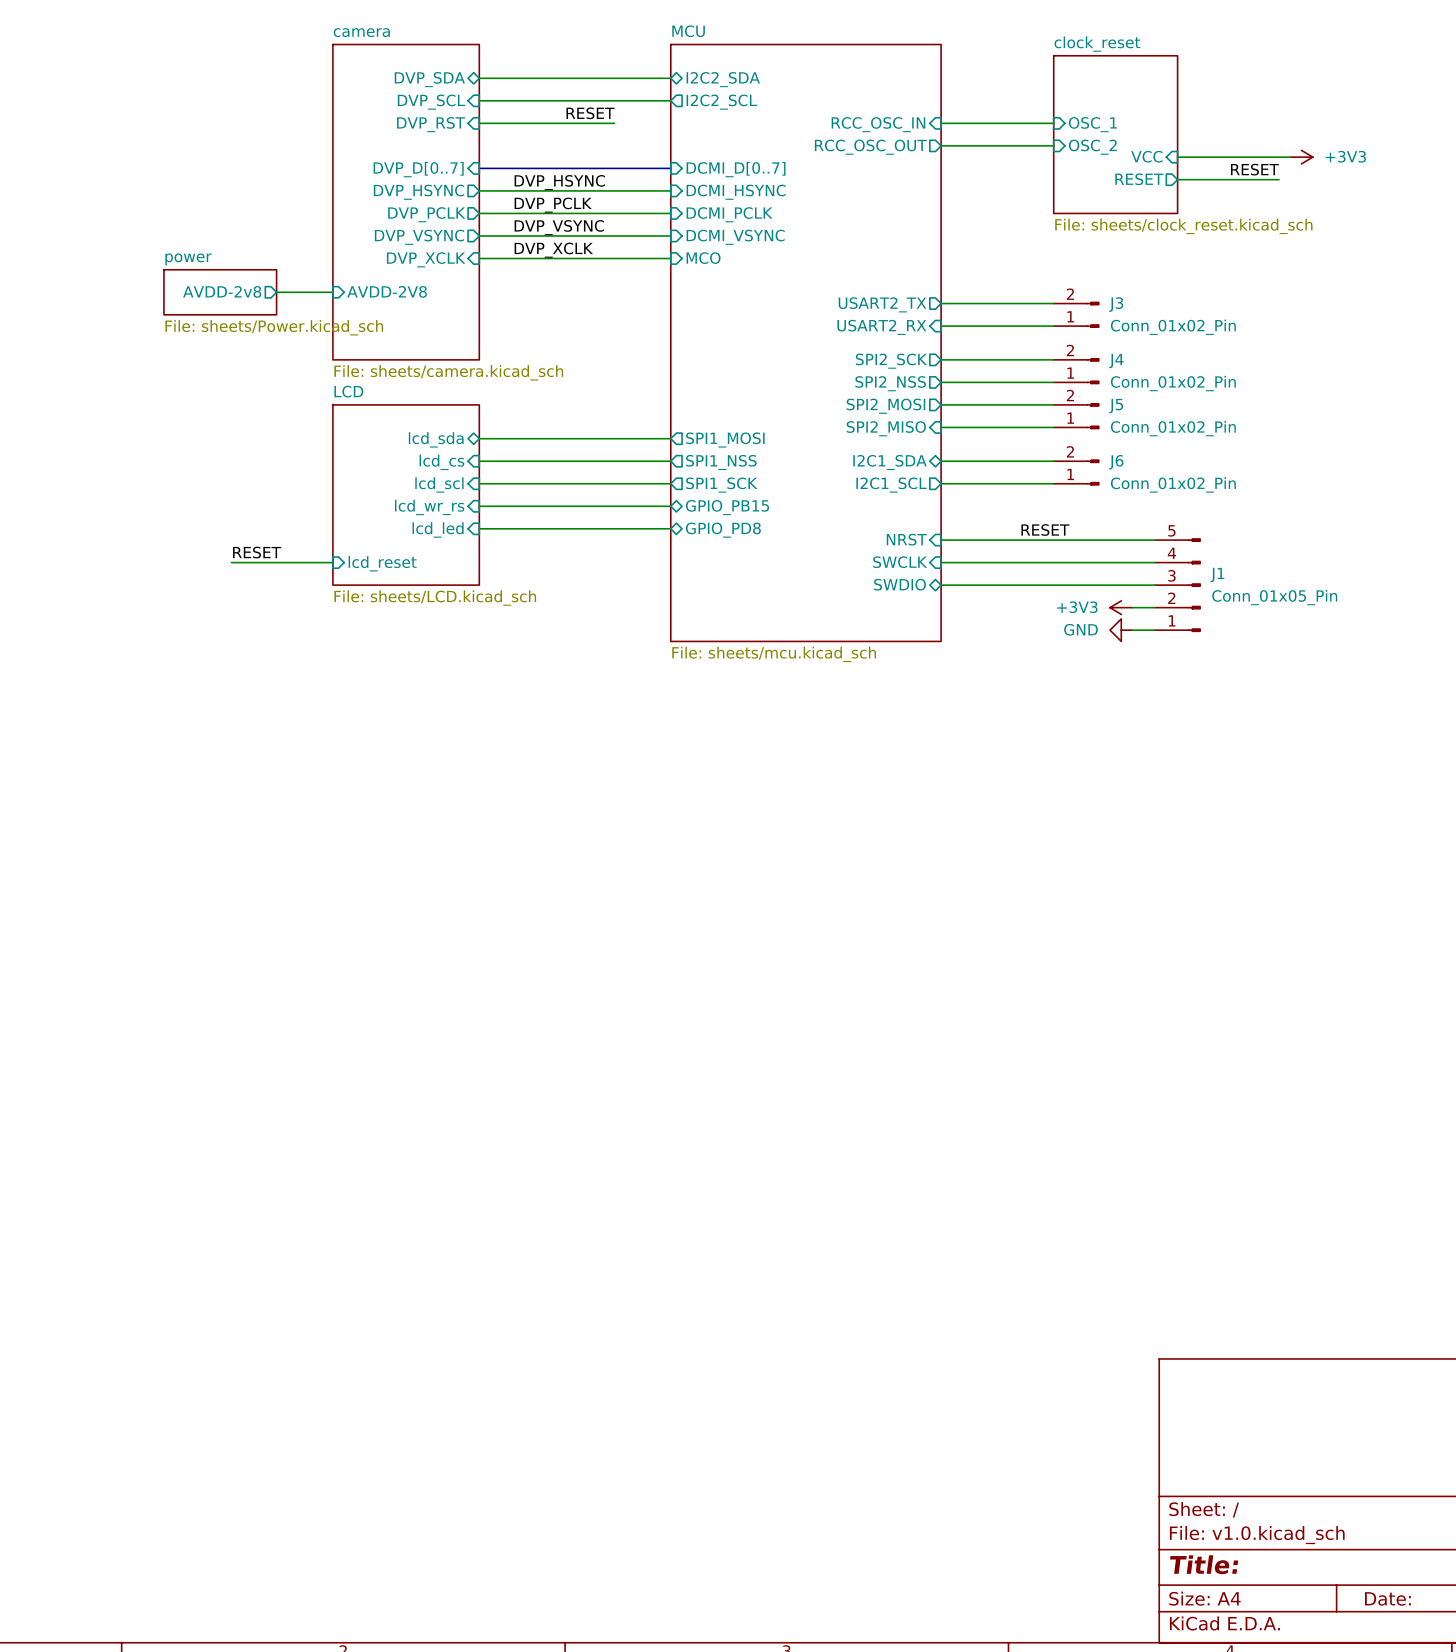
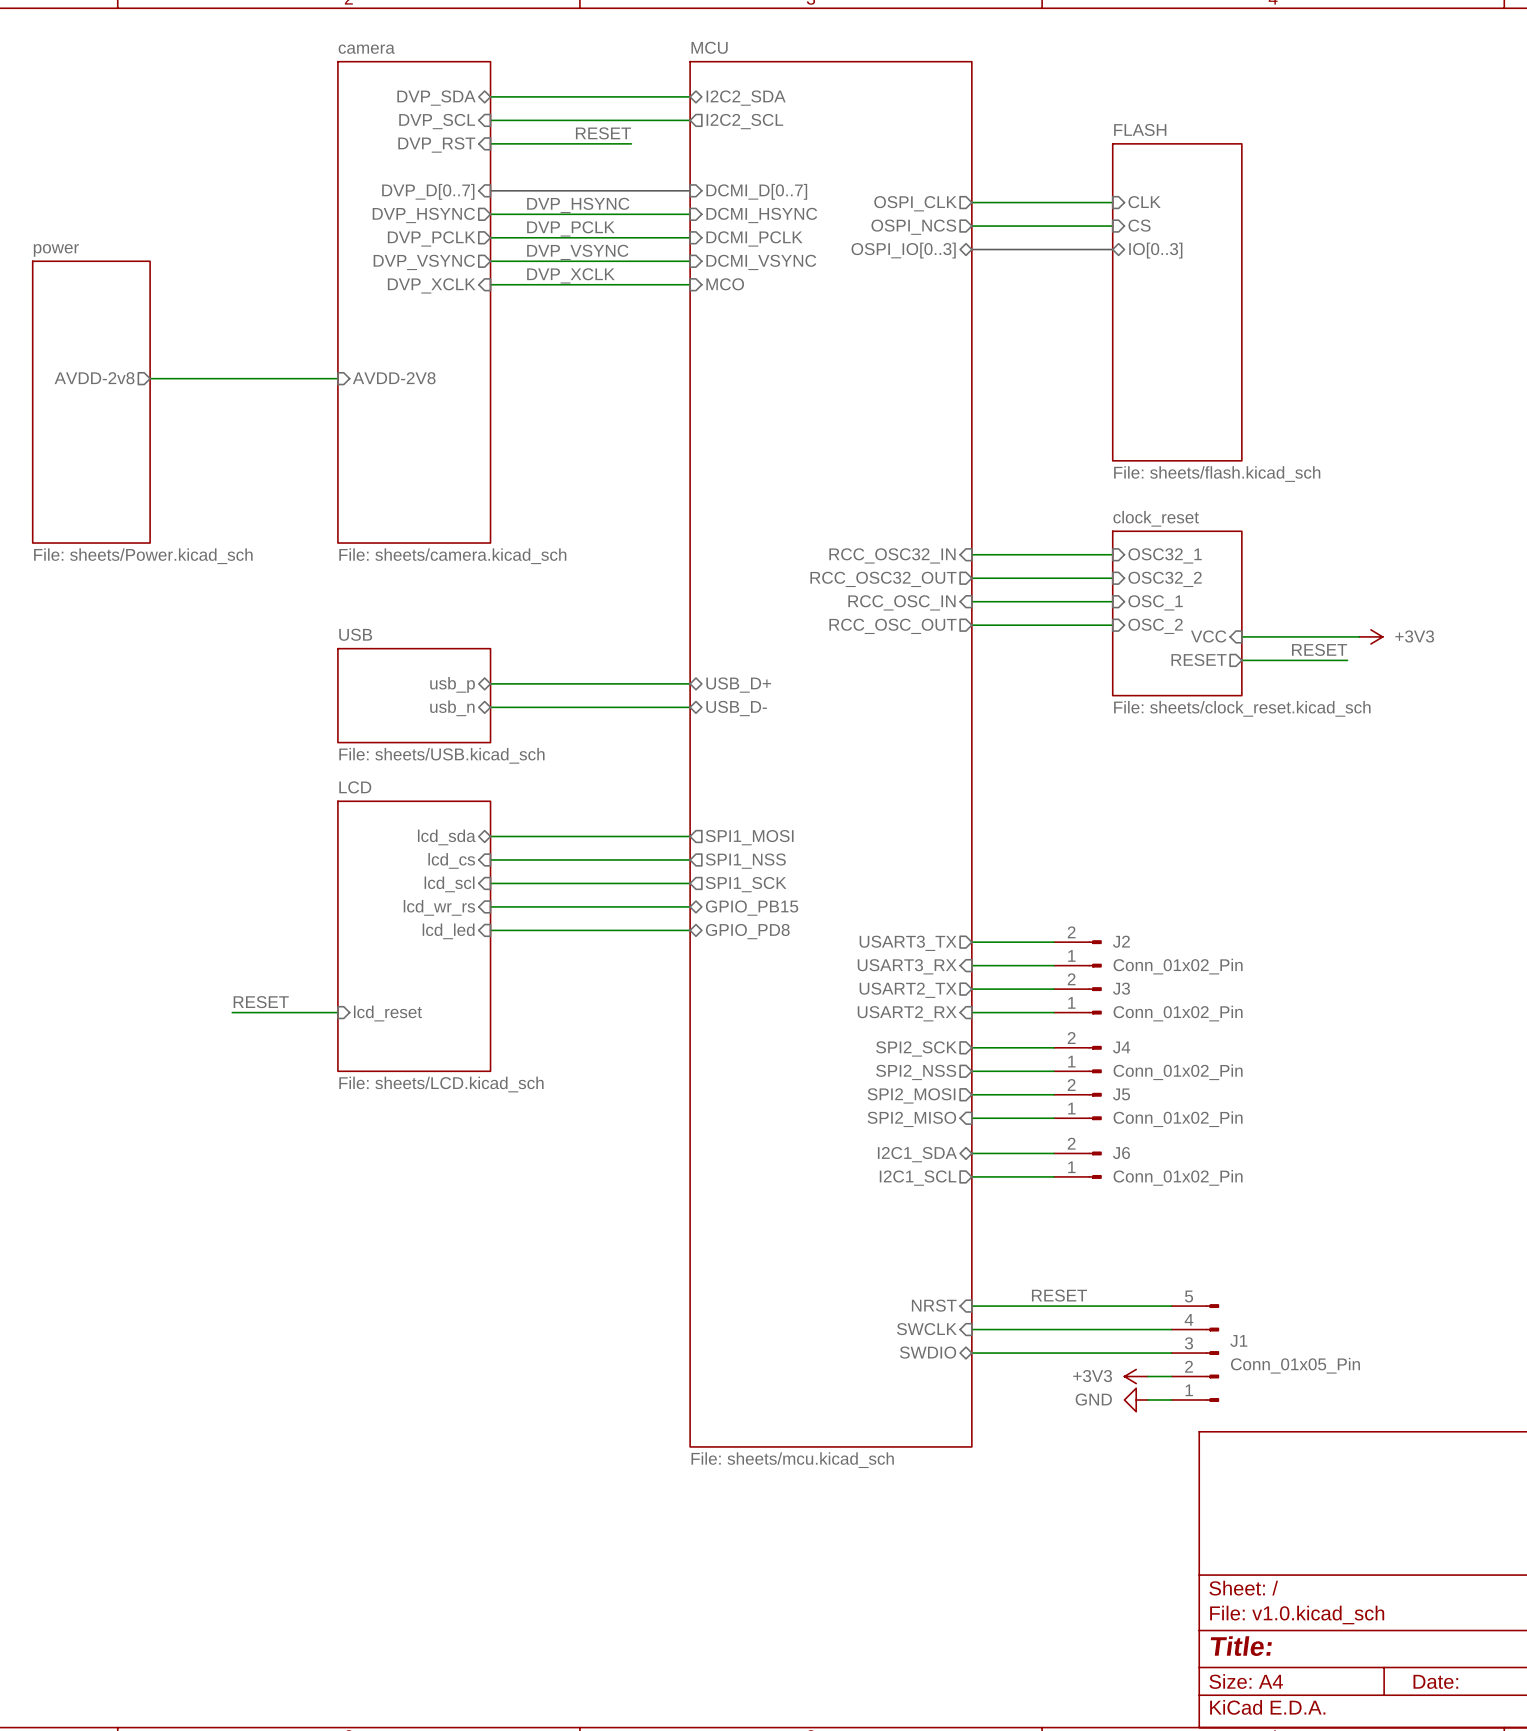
wire: (941, 123) (1053, 123) -> none
sheet pin: RCC_OSC_IN (878, 124) -> none
sheet pin: OSC_1 (1092, 124) -> none
sheet clock_reset: File: sheets/clock_reset.kicad_sch (1115, 134) -> none
wire: (941, 145) (1053, 145) -> none
sheet pin: RCC_OSC_OUT (870, 147) -> none
sheet pin: OSC_2 (1092, 147) -> none
sheet pin: VCC (1146, 156) -> none
wire: (1177, 157) (1290, 157) -> none
power symbol: +3V3 (1301, 157) -> none
label: RESET (1254, 169) -> none
wire: none -> (971, 202) (1112, 202)
sheet pin: none -> CLK (1144, 202)
sheet pin: RESET (1139, 179) -> none
wire: (1177, 179) (1278, 179) -> none
sheet pin: none -> OSPI_CLK (915, 203)
sheet pin: none -> CS (1139, 225)
sheet camera: File: sheets/camera.kicad_sch (406, 202) -> none
wire: none -> (971, 226) (1112, 226)
sheet pin: none -> OSPI_NCS (913, 227)
bus: none -> (971, 249) (1112, 249)
sheet pin: none -> OSPI_IO[0..3] (903, 250)
sheet pin: none -> IO[0..3] (1155, 250)
sheet camera: none -> File: sheets/camera.kicad_sch (414, 302)
sheet FLASH: none -> File: sheets/flash.kicad_sch (1177, 302)
sheet pin position: AVDD-2v8 (222, 291) -> AVDD-2v8 (94, 378)
sheet pin position: AVDD-2V8 (387, 291) -> AVDD-2V8 (394, 378)
sheet power: File: sheets/Power.kicad_sch (220, 292) -> none
wire: (276, 292) (332, 292) -> none
wire: (941, 303) (1053, 303) -> none
sheet pin: USART2_TX (882, 304) -> none
J3 position: (1076, 314) -> (1077, 1000)
wire: (941, 326) (1053, 326) -> none
sheet pin: USART2_RX (881, 327) -> none
sheet MCU: File: sheets/mcu.kicad_sch (805, 342) -> none
wire: none -> (150, 378) (337, 378)
wire: (941, 359) (1053, 359) -> none
sheet pin: SPI2_SCK (891, 361) -> none
sheet power: none -> File: sheets/Power.kicad_sch (91, 402)
J4 position: (1076, 371) -> (1077, 1059)
wire: (941, 382) (1053, 382) -> none
sheet pin: SPI2_NSS (890, 383) -> none
wire: (941, 404) (1053, 404) -> none
sheet pin: SPI2_MOSI (885, 406) -> none
J5 position: (1076, 416) -> (1077, 1106)
wire: (941, 427) (1053, 427) -> none
sheet pin: SPI2_MISO (886, 428) -> none
wire: (479, 438) (670, 438) -> none
sheet pin: lcd_sda (436, 439) -> none
sheet pin: SPI1_MOSI (725, 440) -> none
wire: (479, 461) (670, 461) -> none
wire: (941, 461) (1053, 461) -> none
sheet pin: lcd_cs (441, 462) -> none
sheet pin: SPI1_NSS (721, 462) -> none
sheet pin: I2C1_SDA (889, 462) -> none
J6 position: (1076, 472) -> (1077, 1165)
wire: (479, 483) (670, 483) -> none
wire: (941, 483) (1053, 483) -> none
sheet pin: lcd_scl (439, 484) -> none
sheet pin: SPI1_SCK (721, 485) -> none
sheet pin: I2C1_SCL (891, 485) -> none
sheet LCD: File: sheets/LCD.kicad_sch (406, 495) -> none
wire: (479, 506) (670, 506) -> (490, 683) (690, 683)
sheet pin: lcd_wr_rs (429, 507) -> none
sheet pin: GPIO_PB15 (727, 507) -> none
wire: none -> (971, 554) (1112, 554)
sheet pin: none -> RCC_OSC32_IN (892, 555)
sheet pin: none -> OSC32_1 (1165, 555)
wire: (479, 528) (670, 528) -> (490, 707) (690, 707)
sheet pin: lcd_led (438, 529) -> none
sheet pin: GPIO_PD8 (723, 530) -> none
label: RESET (1045, 530) -> none
sheet pin shape: input (906, 539) -> output (883, 579)
sheet pin: NRST (906, 539) -> RCC_OSC32_OUT (883, 579)
wire: (1076, 540) (1155, 540) -> none
sheet pin: none -> OSC32_2 (1165, 579)
label: RESET (257, 552) -> none
wire: (231, 562) (332, 562) -> none
sheet pin: SWCLK (900, 562) -> RCC_OSC_IN (901, 602)
wire: (1076, 562) (1155, 562) -> none
sheet pin: lcd_reset (382, 563) -> none
sheet pin: none -> OSC_1 (1155, 602)
sheet clock_reset: none -> File: sheets/clock_reset.kicad_sch (1177, 613)
sheet pin shape: bidirectional (900, 584) -> output (892, 626)
sheet pin: SWDIO (900, 584) -> RCC_OSC_OUT (892, 626)
wire: (1076, 585) (1155, 585) -> none
J1 position: (1177, 585) -> (1195, 1353)
sheet pin: none -> OSC_2 (1155, 626)
sheet pin: none -> VCC (1208, 636)
wire: none -> (1241, 636) (1359, 636)
power symbol rotation: 0° (1121, 607) -> 180° (1370, 636)
power symbol position: +3V3 (1121, 607) -> +3V3 (1370, 636)
wire: (1132, 607) (1155, 607) -> none
label: none -> RESET (1319, 649)
sheet pin: none -> RESET (1199, 659)
wire: none -> (1241, 660) (1347, 660)
power symbol: GND (1121, 630) -> none
wire: (1132, 630) (1155, 630) -> none
sheet pin: none -> usb_p (452, 684)
sheet pin: none -> USB_D+ (738, 685)
sheet USB: none -> File: sheets/USB.kicad_sch (414, 695)
sheet pin: none -> usb_n (452, 708)
sheet pin: none -> USB_D- (736, 708)
sheet MCU: none -> File: sheets/mcu.kicad_sch (830, 754)
wire: none -> (490, 836) (690, 836)
sheet pin: none -> lcd_sda (446, 837)
sheet pin: none -> SPI1_MOSI (749, 837)
wire: none -> (490, 859) (690, 859)
sheet pin: none -> lcd_cs (451, 860)
sheet pin: none -> SPI1_NSS (745, 861)
wire: none -> (490, 883) (690, 883)
sheet pin: none -> lcd_scl (449, 884)
sheet pin: none -> SPI1_SCK (746, 884)
wire: none -> (490, 906) (690, 906)
sheet pin: none -> lcd_wr_rs (439, 907)
sheet pin: none -> GPIO_PB15 (752, 908)
wire: none -> (490, 930) (690, 930)
sheet pin: none -> lcd_led (448, 931)
sheet pin: none -> GPIO_PD8 (747, 931)
sheet LCD: none -> File: sheets/LCD.kicad_sch (414, 936)
wire: none -> (971, 942) (1054, 942)
sheet pin: none -> USART3_TX (908, 943)
J2: none -> Conn_01x02_Pin (1077, 953)
wire: none -> (971, 965) (1054, 965)
sheet pin: none -> USART3_RX (907, 966)
wire: none -> (971, 989) (1054, 989)
sheet pin: none -> USART2_TX (908, 990)
label: none -> RESET (261, 1002)
wire: none -> (232, 1012) (337, 1012)
wire: none -> (971, 1012) (1054, 1012)
sheet pin: none -> lcd_reset (387, 1013)
sheet pin: none -> USART2_RX (907, 1013)
wire: none -> (971, 1047) (1054, 1047)
sheet pin: none -> SPI2_SCK (916, 1048)
wire: none -> (971, 1071) (1054, 1071)
sheet pin: none -> SPI2_NSS (916, 1072)
wire: none -> (971, 1094) (1054, 1094)
sheet pin: none -> SPI2_MOSI (911, 1095)
wire: none -> (971, 1118) (1054, 1118)
sheet pin: none -> SPI2_MISO (911, 1119)
wire: none -> (971, 1153) (1054, 1153)
sheet pin: none -> I2C1_SDA (917, 1154)
wire: none -> (971, 1176) (1054, 1176)
sheet pin: none -> I2C1_SCL (918, 1178)
label: none -> RESET (1059, 1295)
sheet pin: none -> NRST (934, 1305)
wire: none -> (971, 1306) (1171, 1306)
sheet pin: none -> SWCLK (926, 1329)
wire: none -> (971, 1329) (1171, 1329)
sheet pin: none -> SWDIO (928, 1352)
wire: none -> (971, 1353) (1171, 1353)
power symbol: none -> +3V3 (1136, 1376)
wire: none -> (1147, 1376) (1171, 1376)
power symbol: none -> GND (1136, 1399)
wire: none -> (1147, 1399) (1171, 1399)

